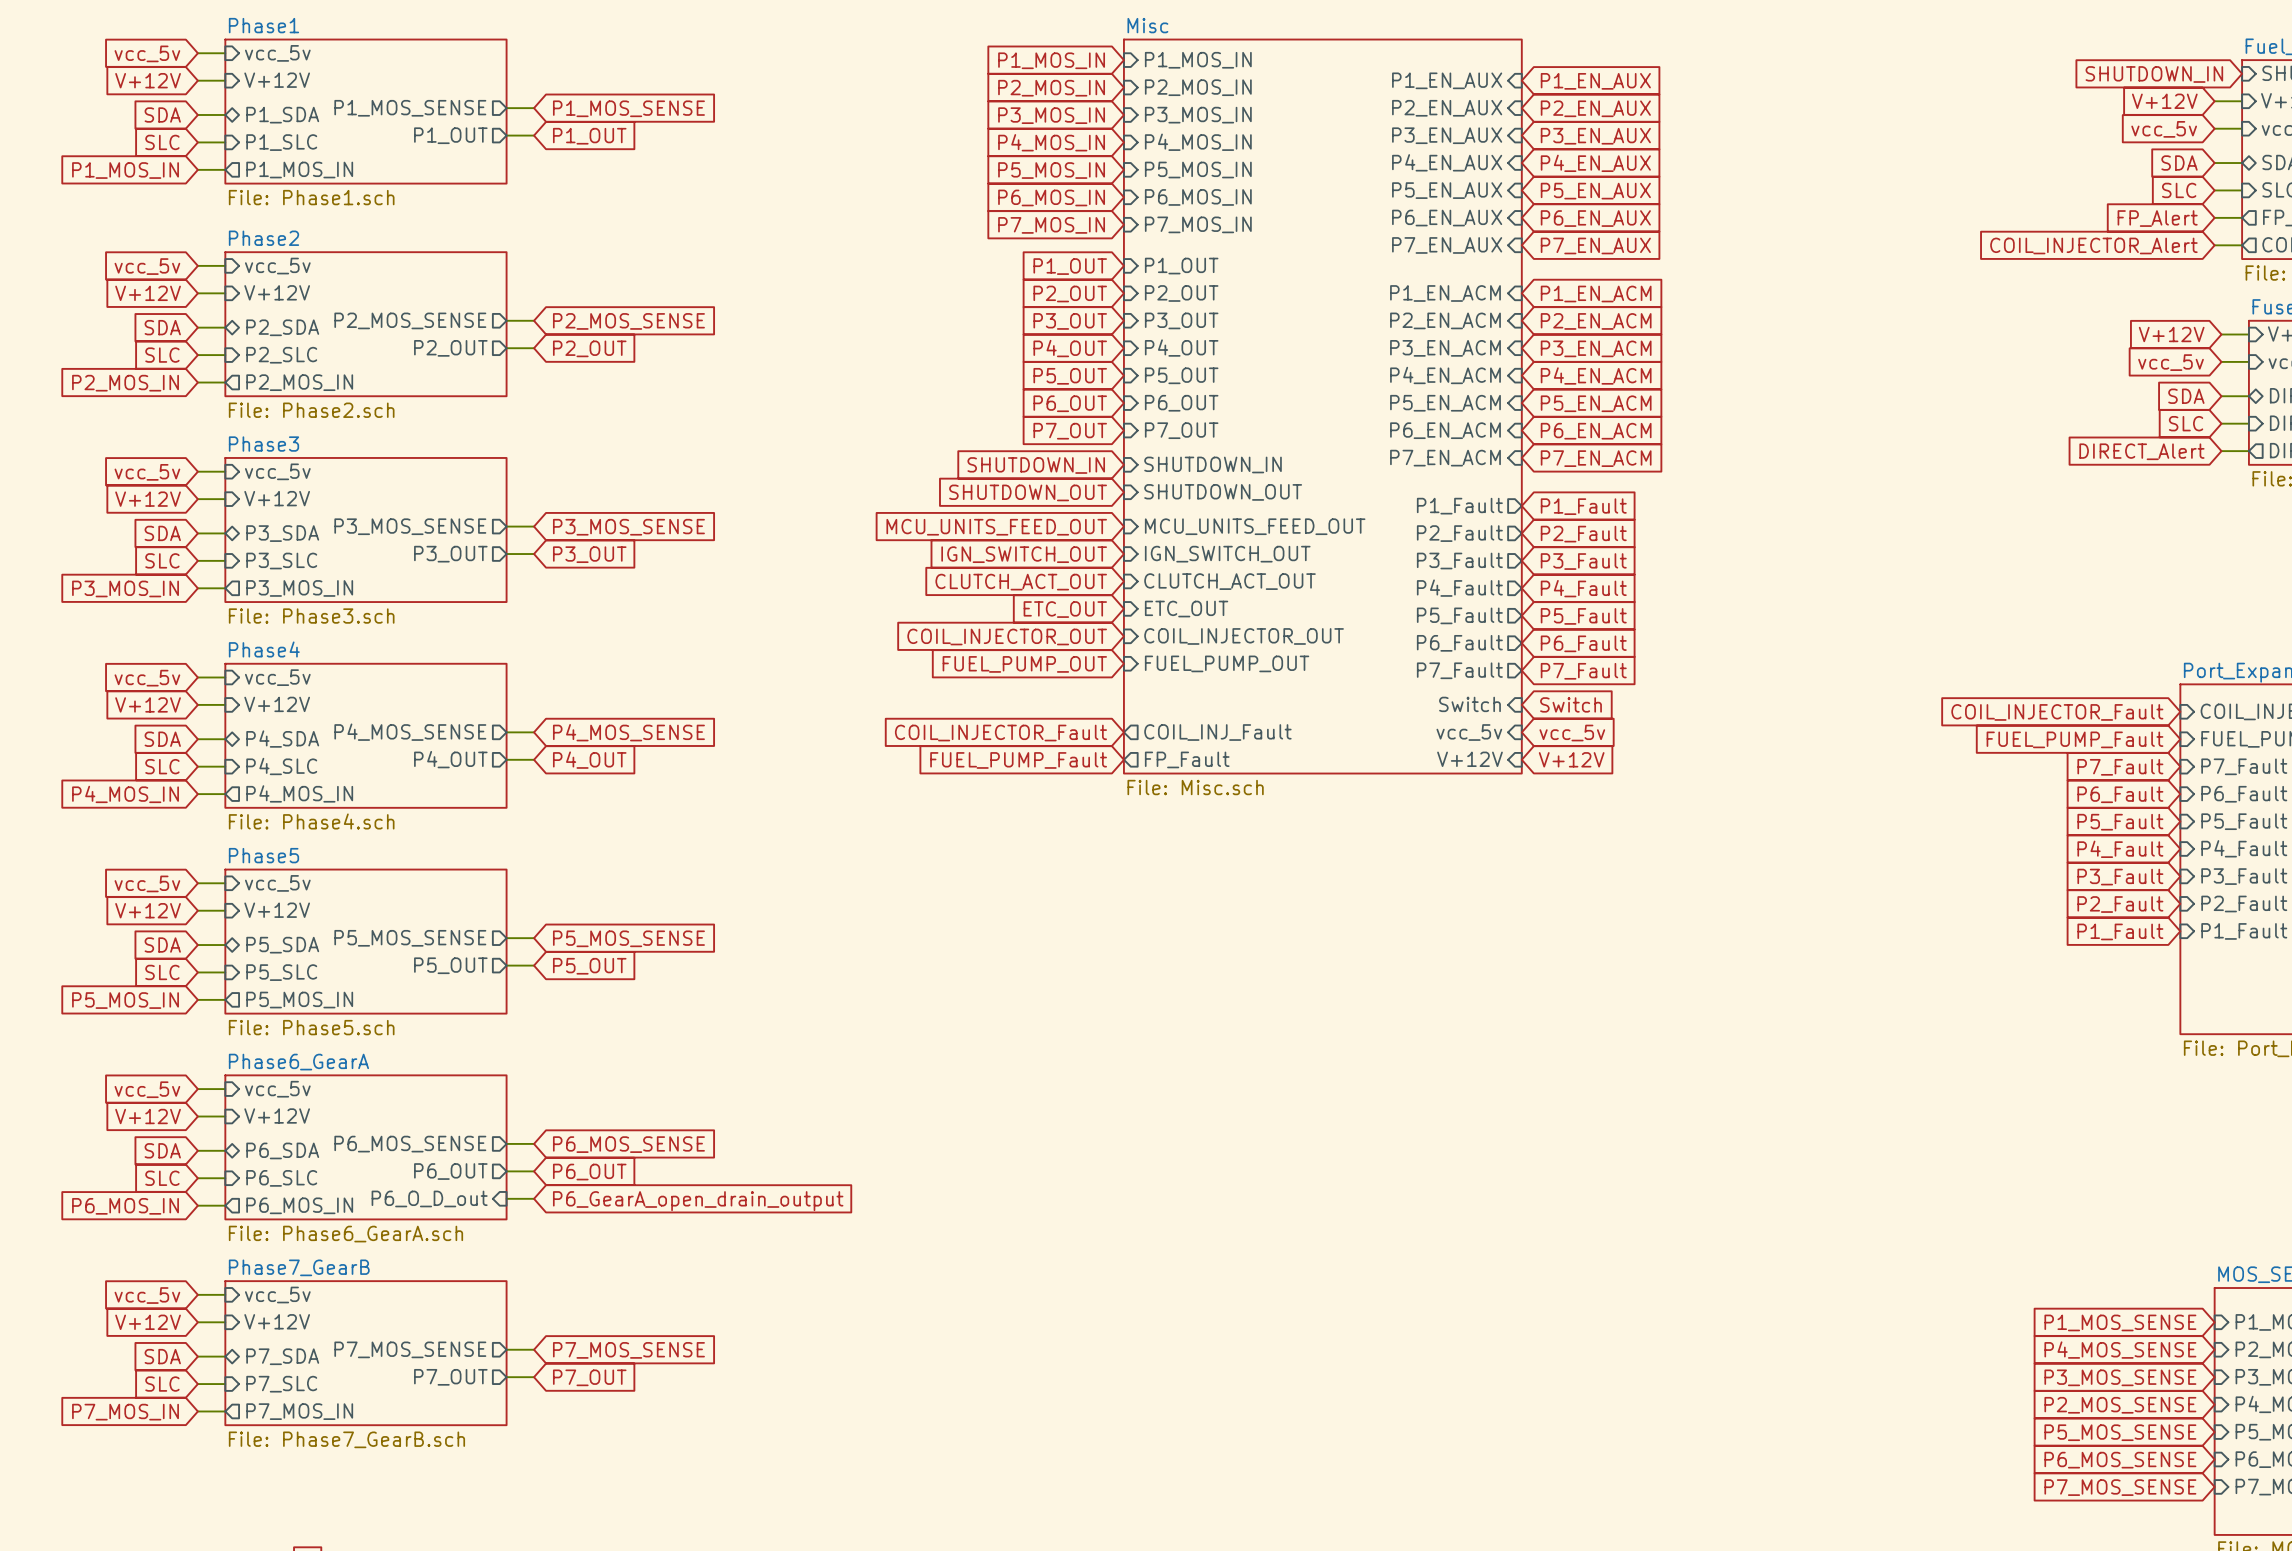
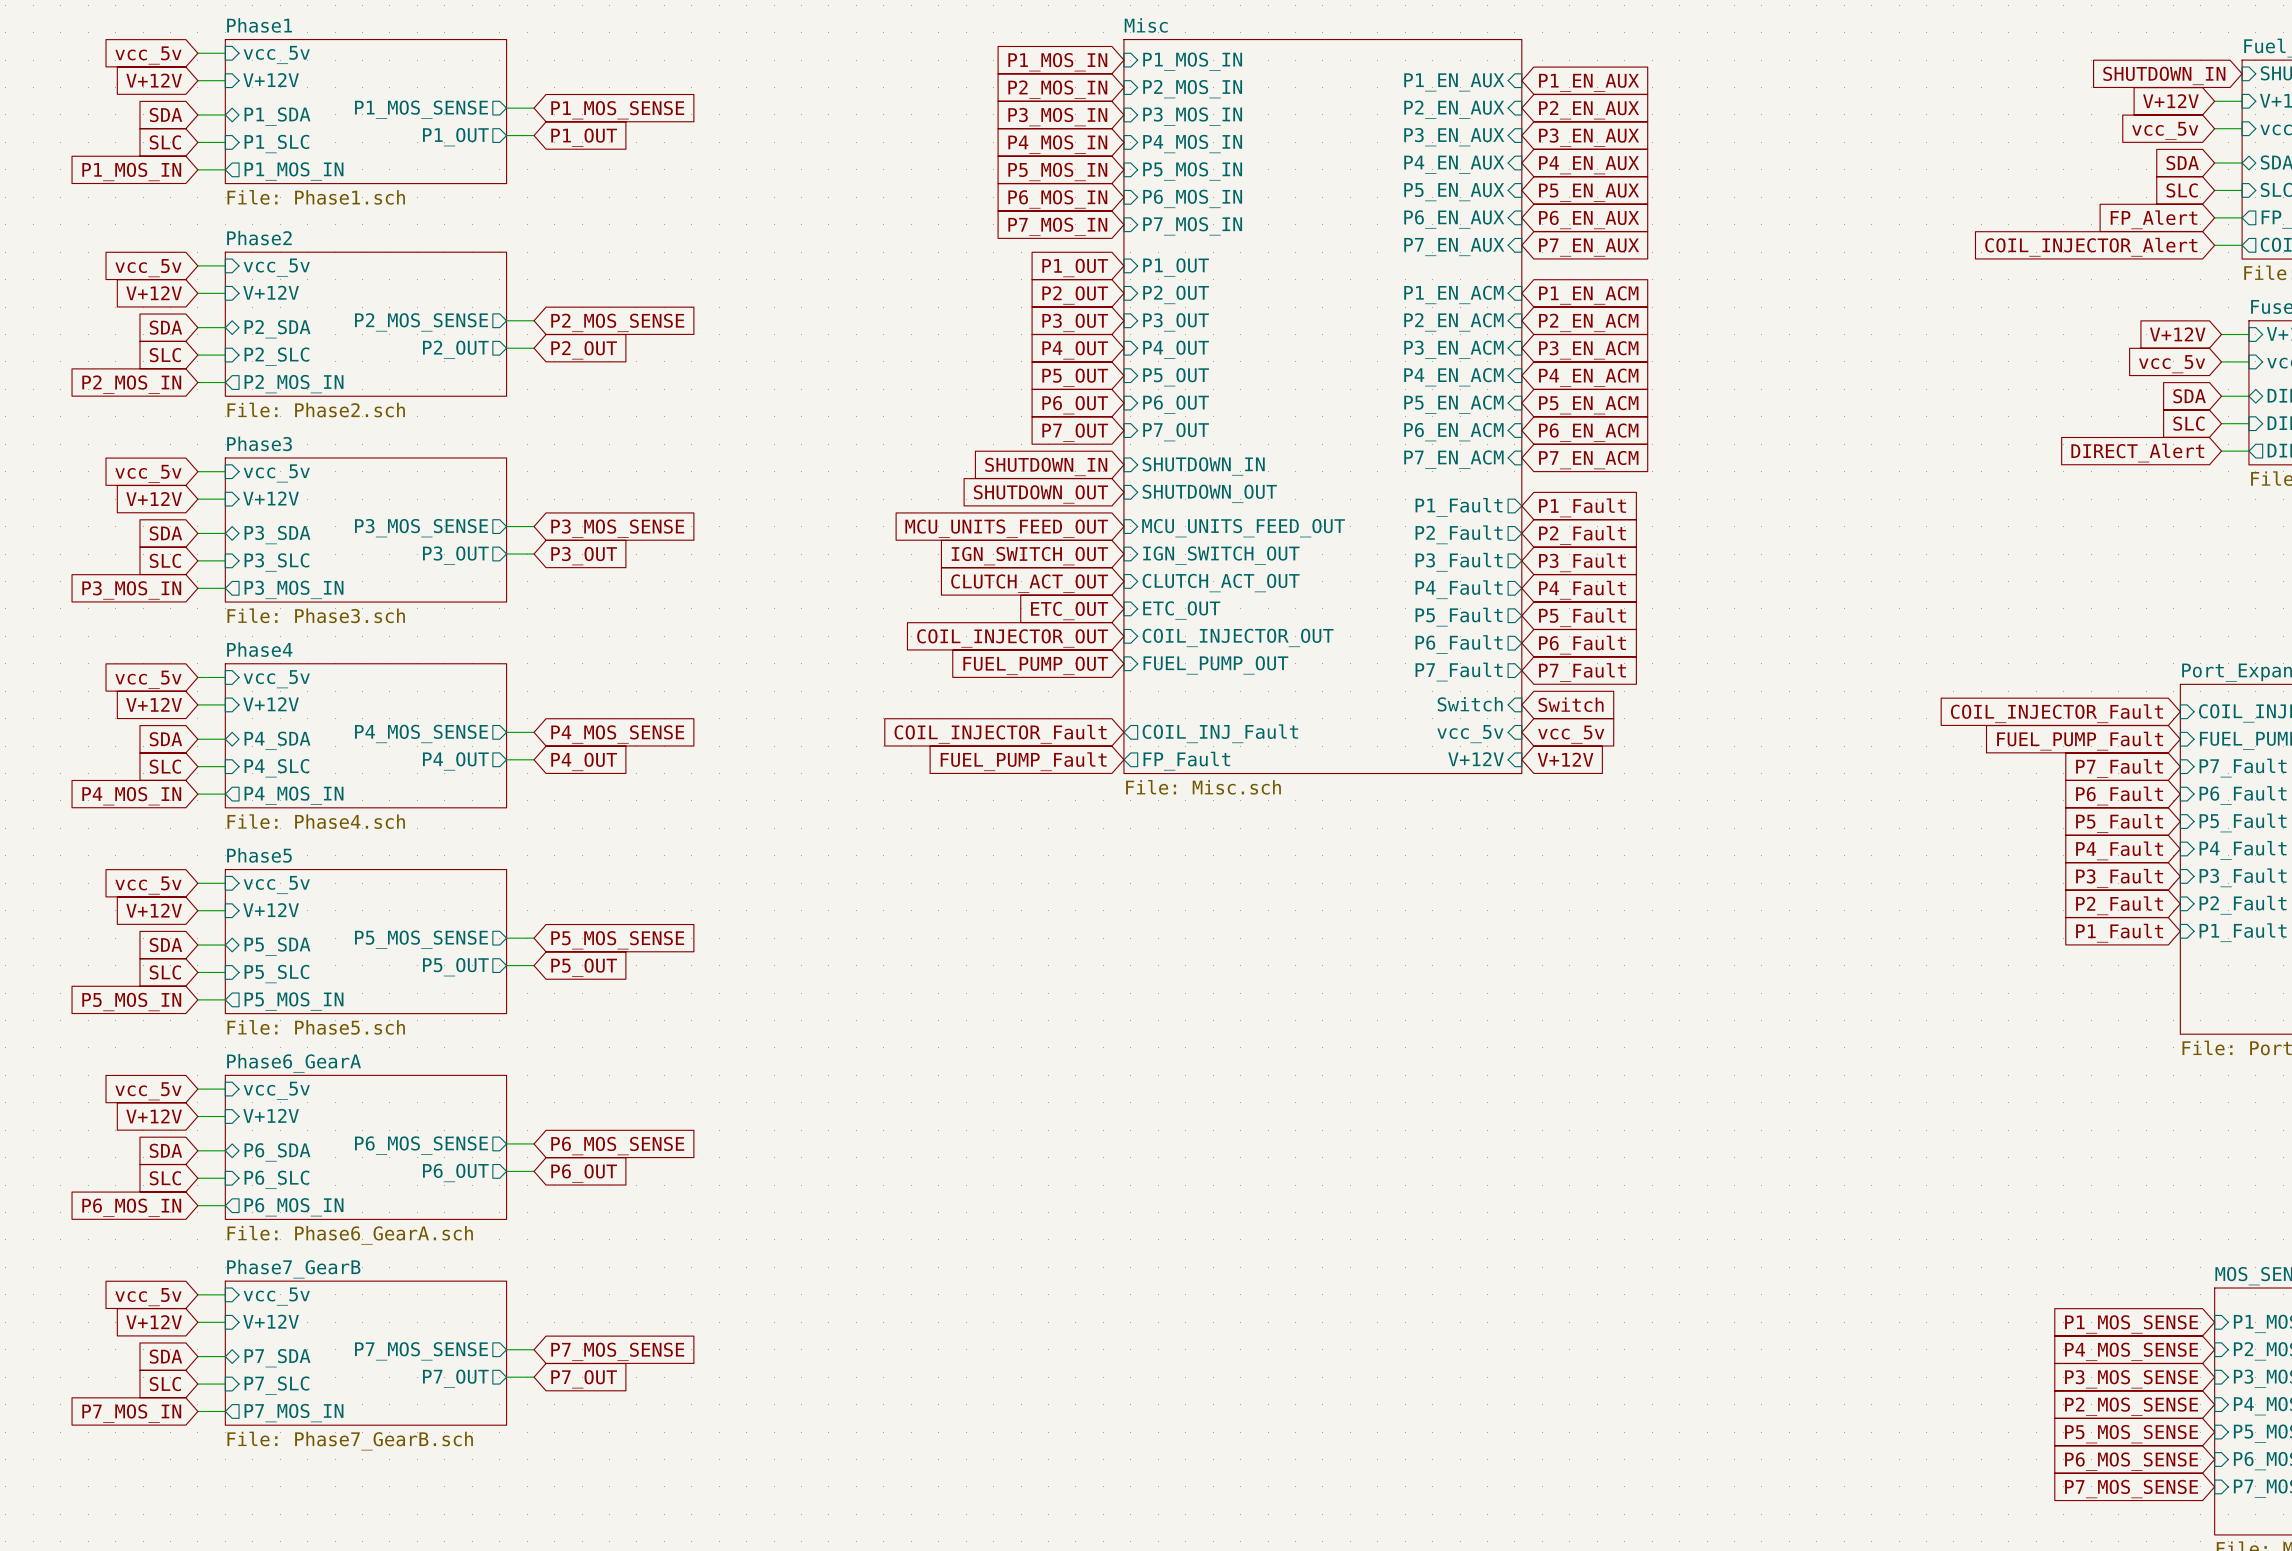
sheet pin: P6_O_D_out (429, 1198) -> none
wire: (506, 1198) (534, 1198) -> none
global label: P6_GearA_open_drain_output (698, 1201) -> none

